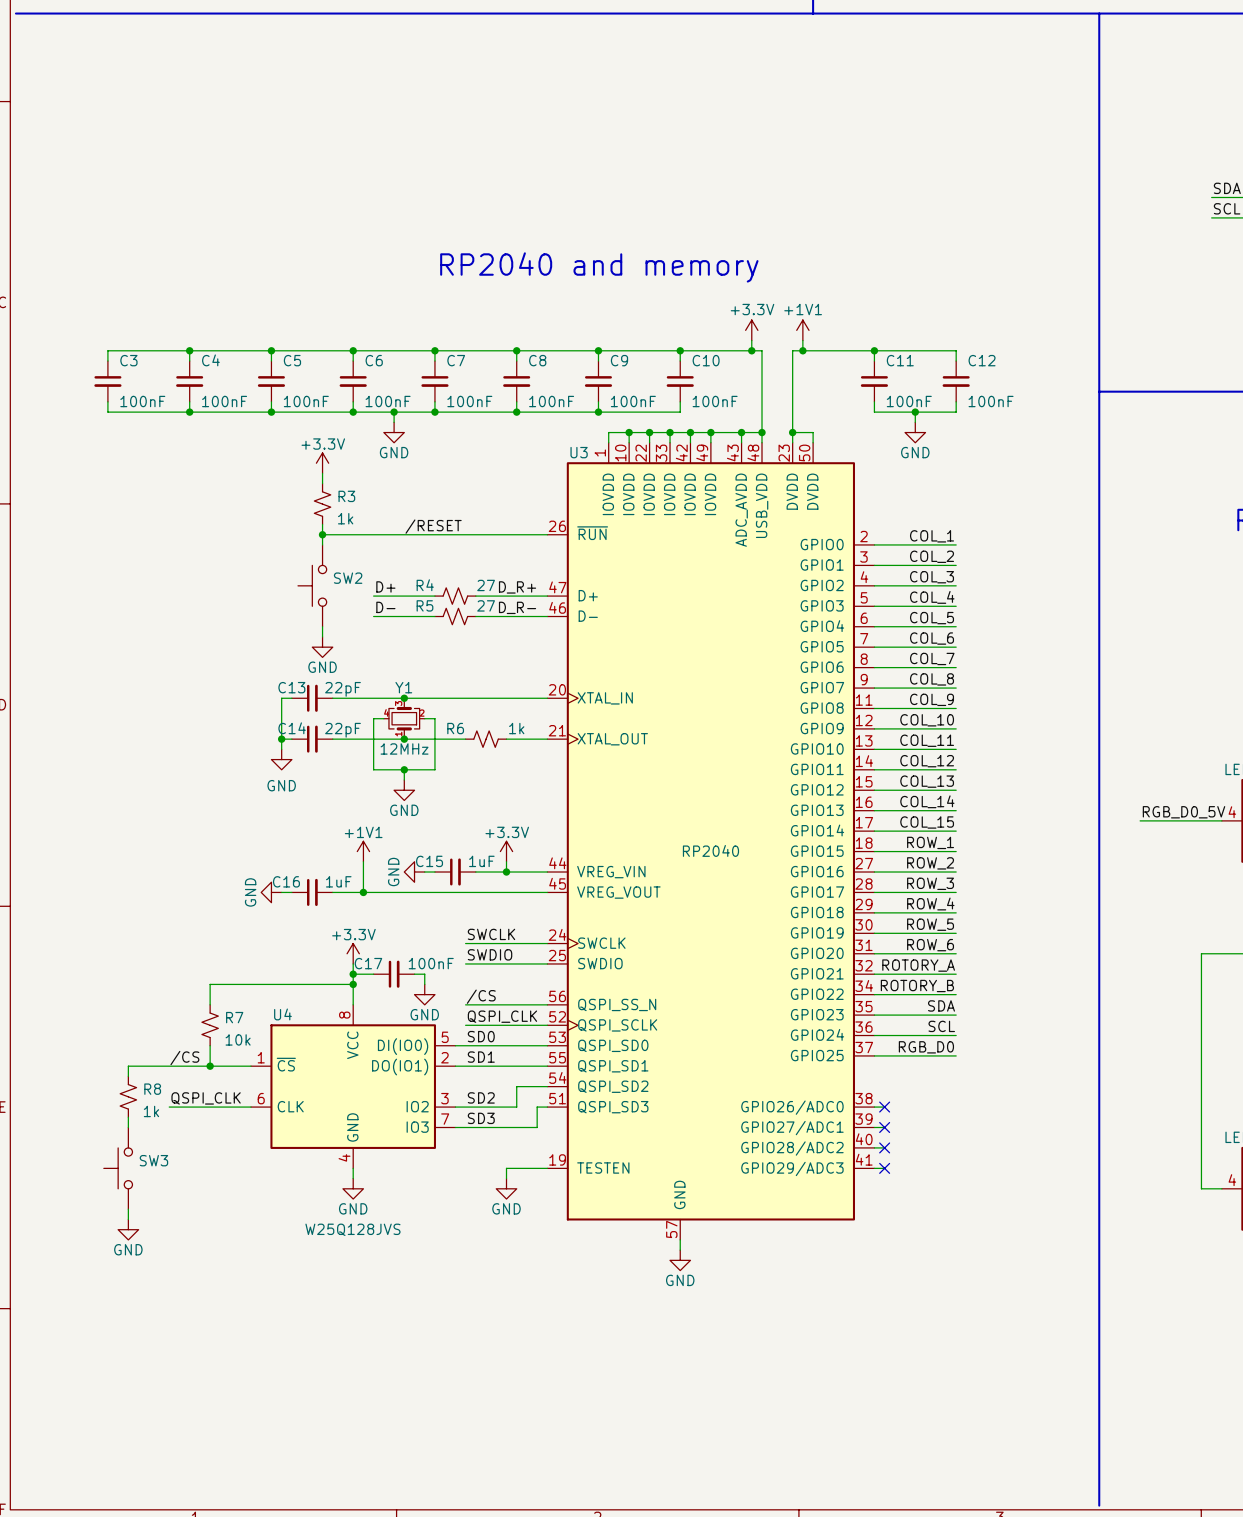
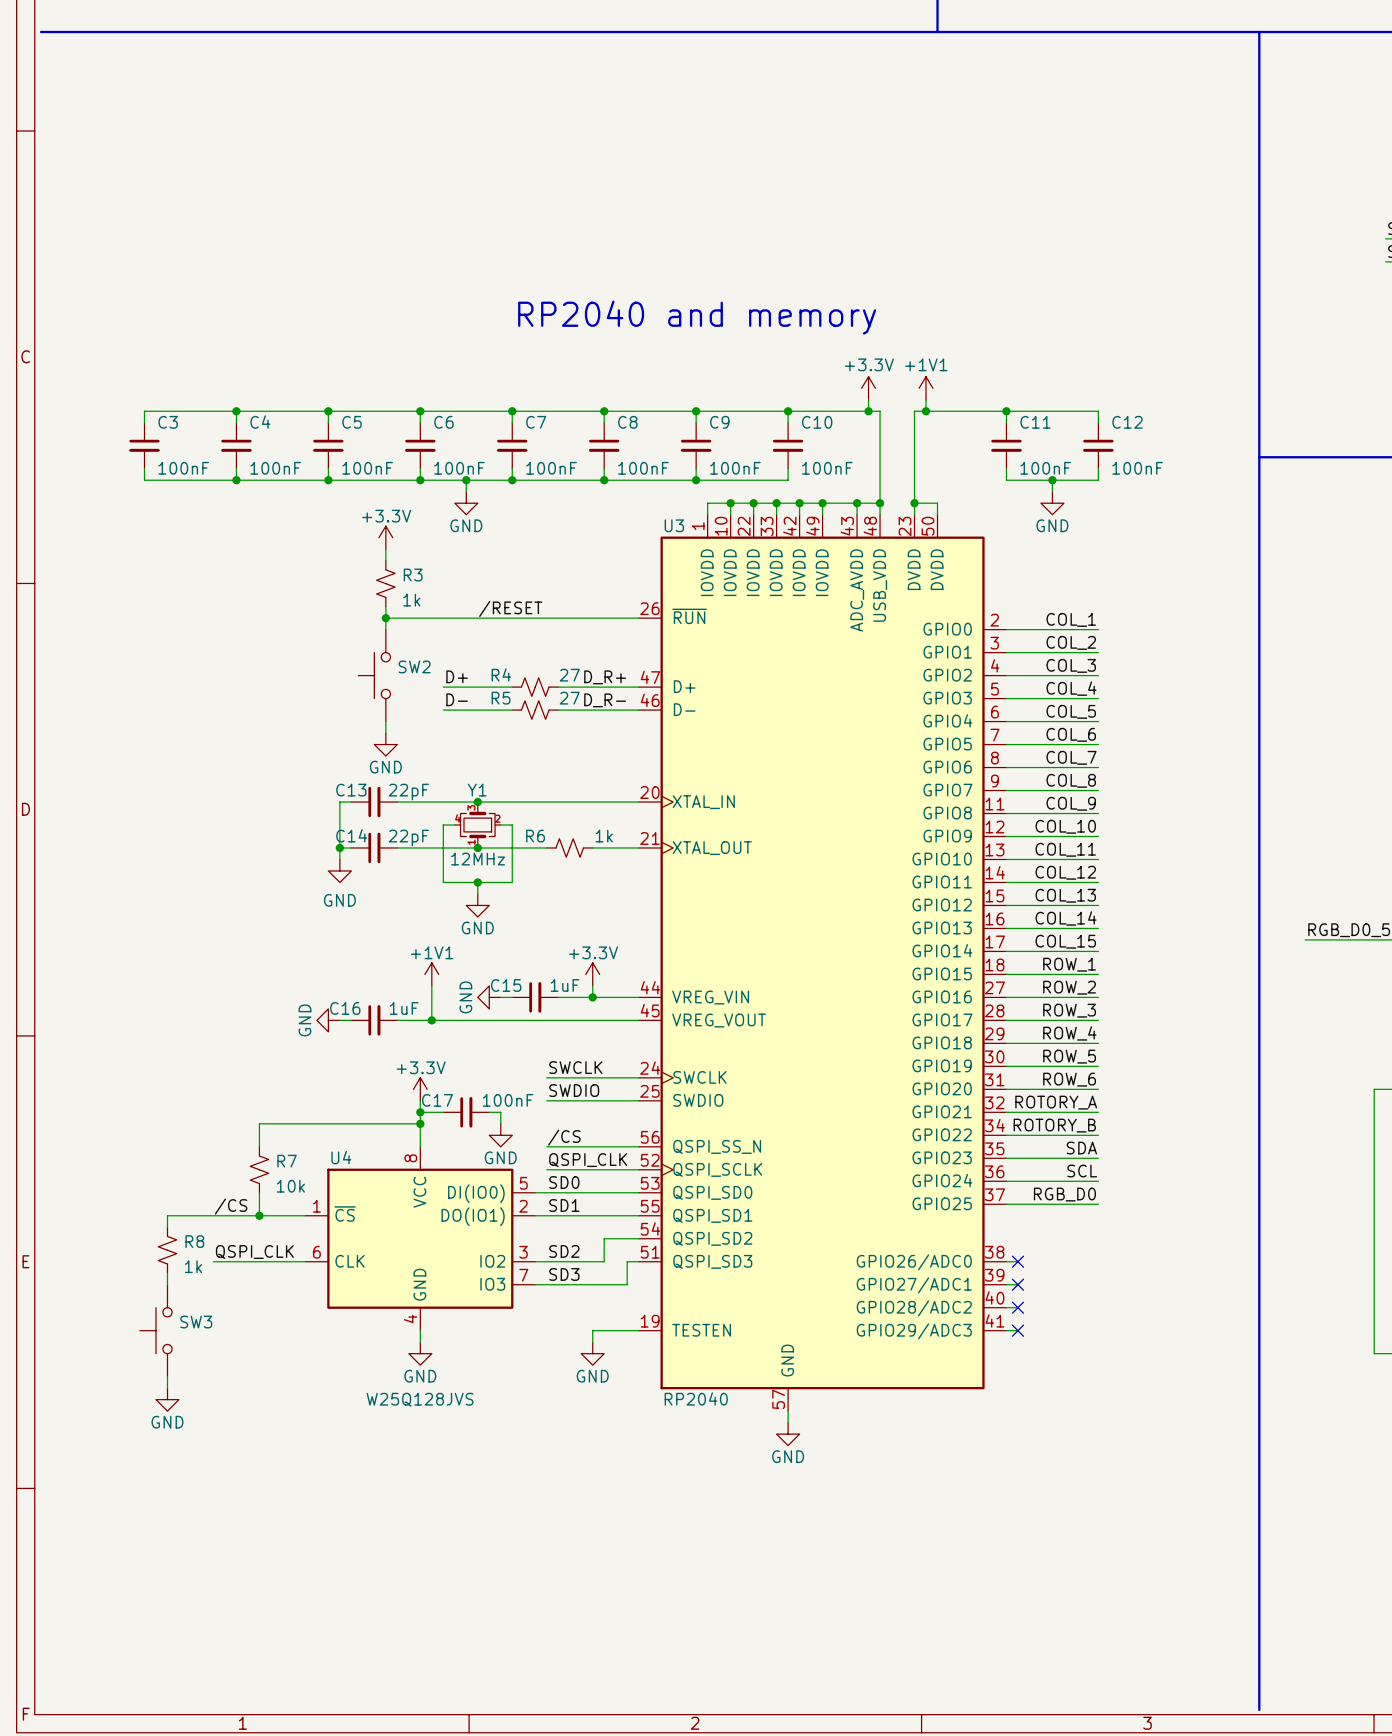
U3 value position: RP2040 (710, 850) -> RP2040 (696, 1398)

